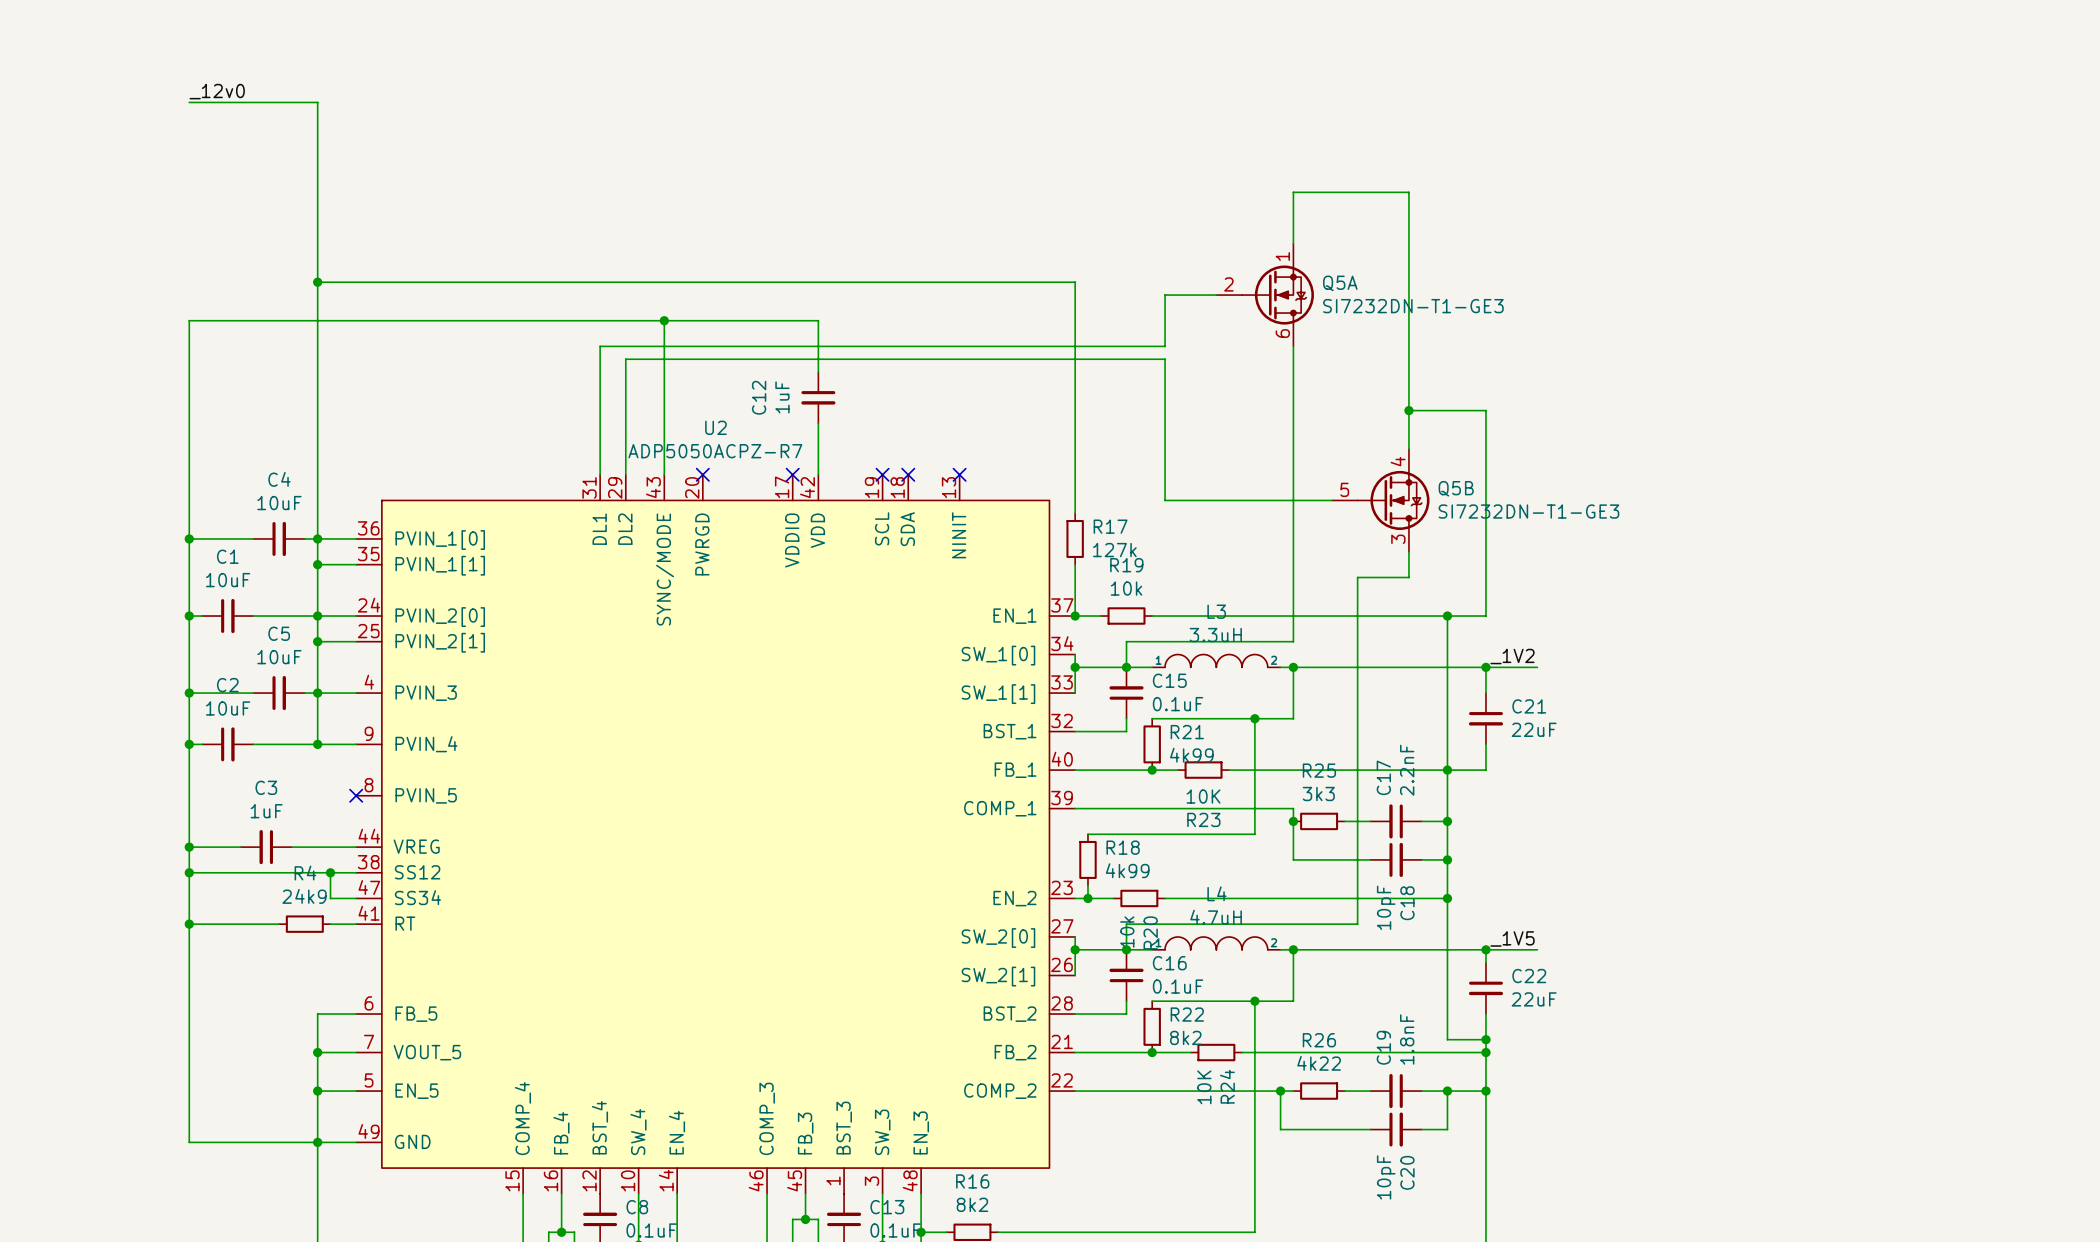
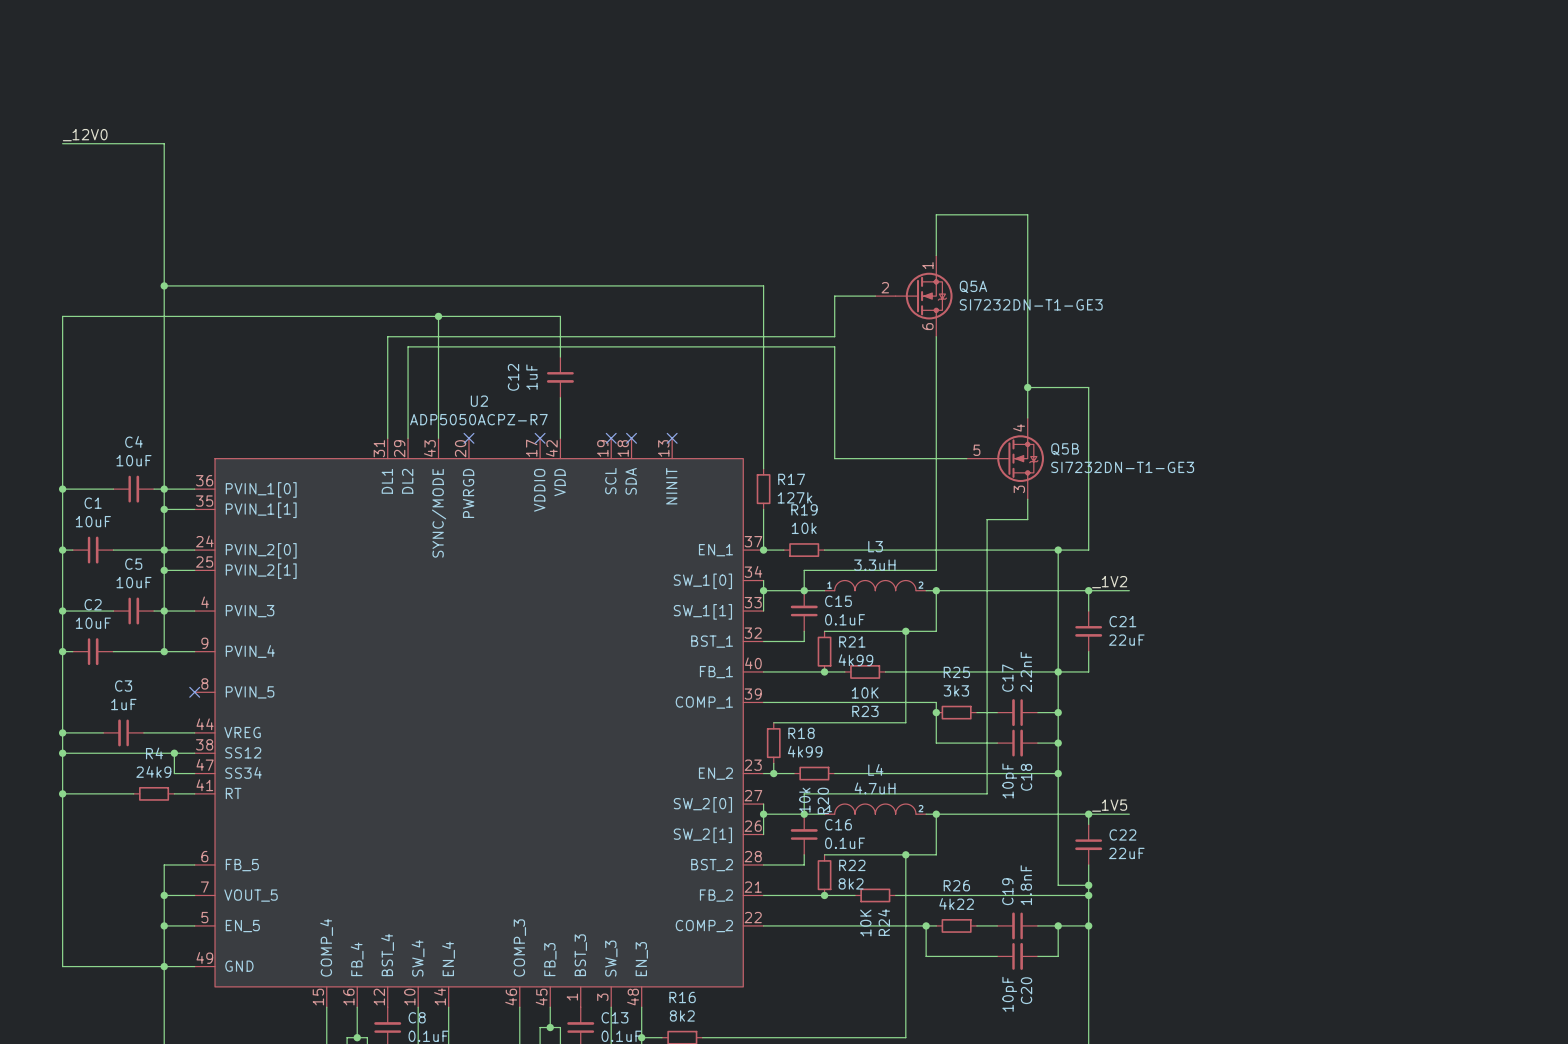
label: _12v0 (217, 91) -> _12V0 (85, 135)

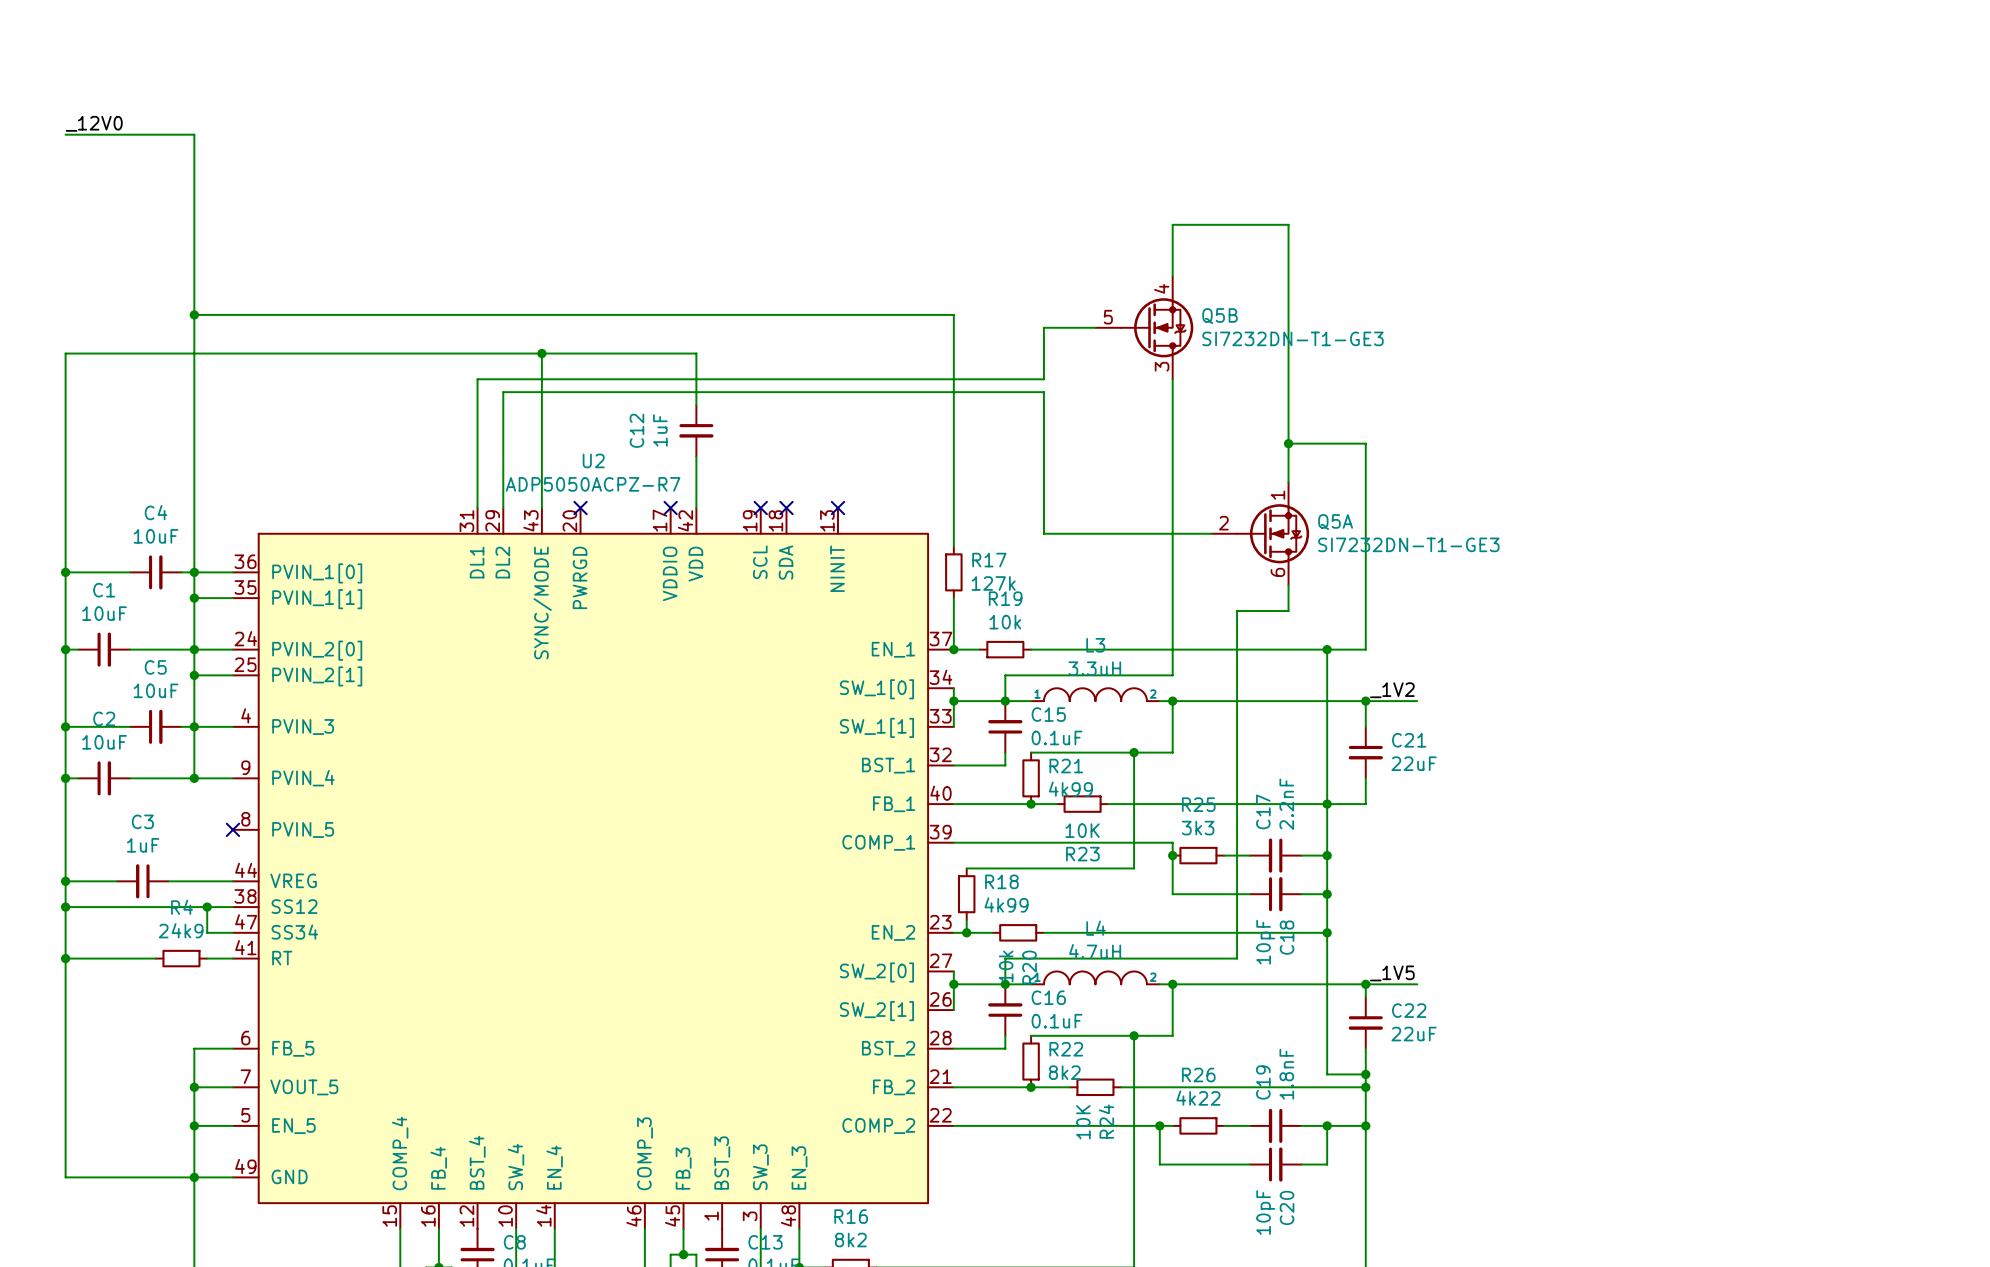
Q5A position: (913, 296) -> (1260, 533)
Q5B position: (1005, 458) -> (1144, 327)

